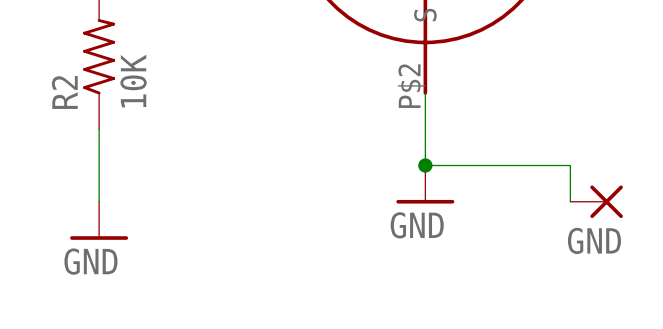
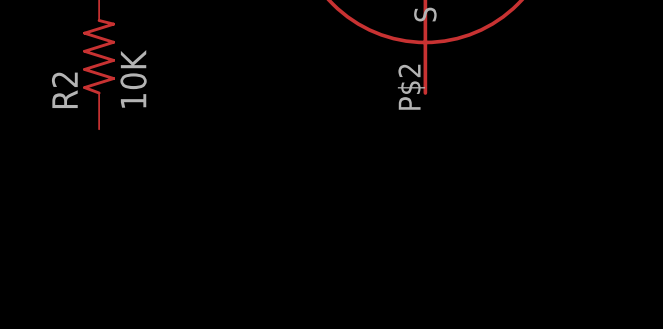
wire: (425, 93) (425, 165) (570, 165) (570, 201) -> none
wire: (99, 129) (99, 201) -> none
junction: (425, 165) -> none
power symbol: GND (425, 184) -> none
GND: (596, 201) -> none
power symbol: GND (99, 220) -> none

